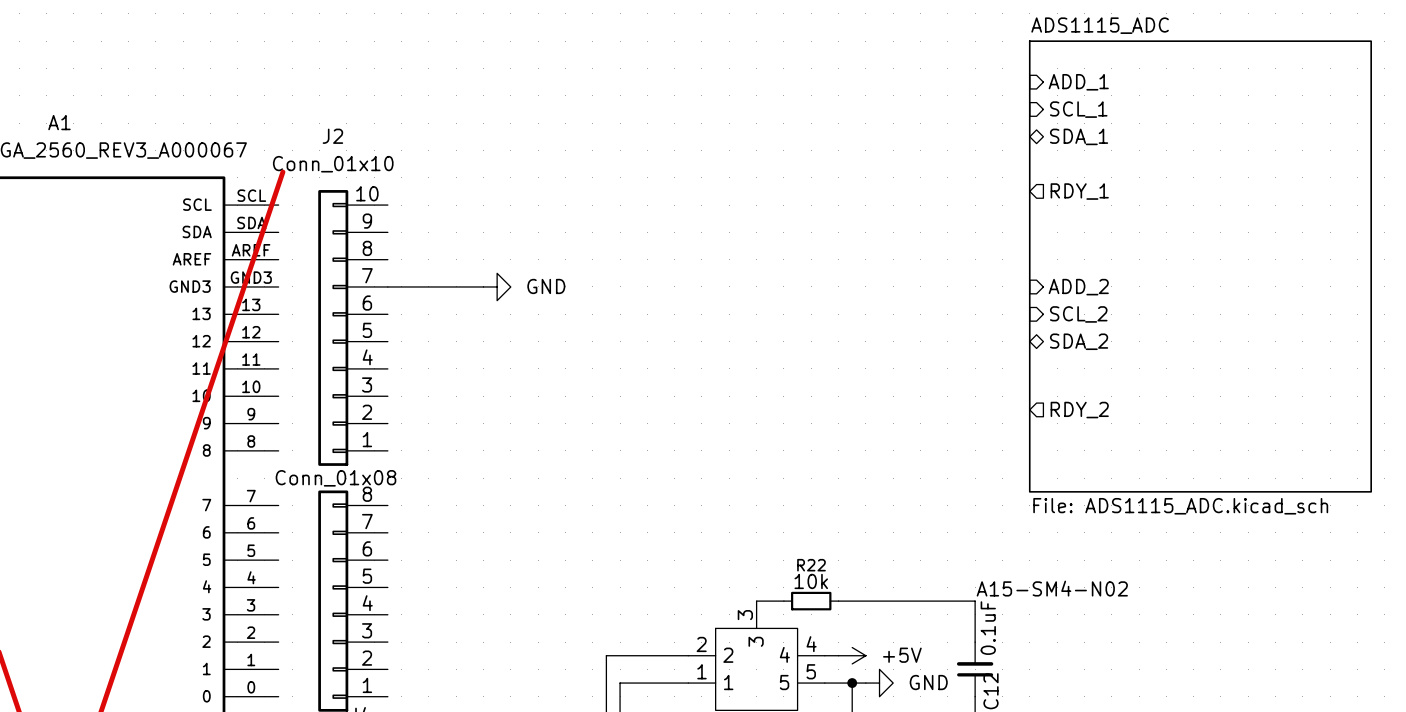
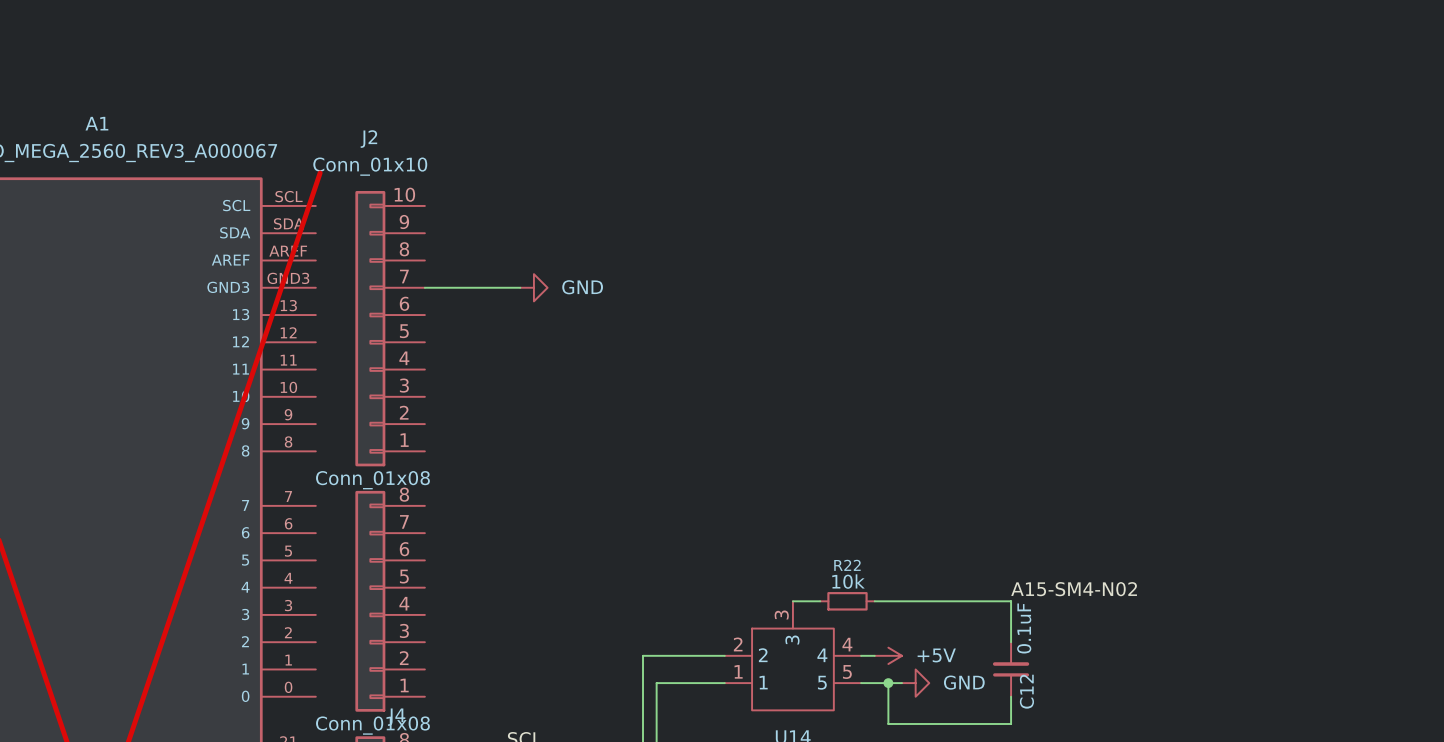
sheet pin: ADD_1 (1078, 82) -> none
sheet pin: SCL_1 (1078, 109) -> none
sheet pin: SDA_1 (1079, 136) -> none
sheet pin: RDY_1 (1079, 191) -> none
sheet ADS1115_ADC: File: ADS1115_ADC.kicad_sch (1200, 266) -> none
sheet pin: ADD_2 (1078, 287) -> none
sheet pin: SCL_2 (1078, 314) -> none
sheet pin: SDA_2 (1079, 341) -> none
sheet pin: RDY_2 (1079, 410) -> none

